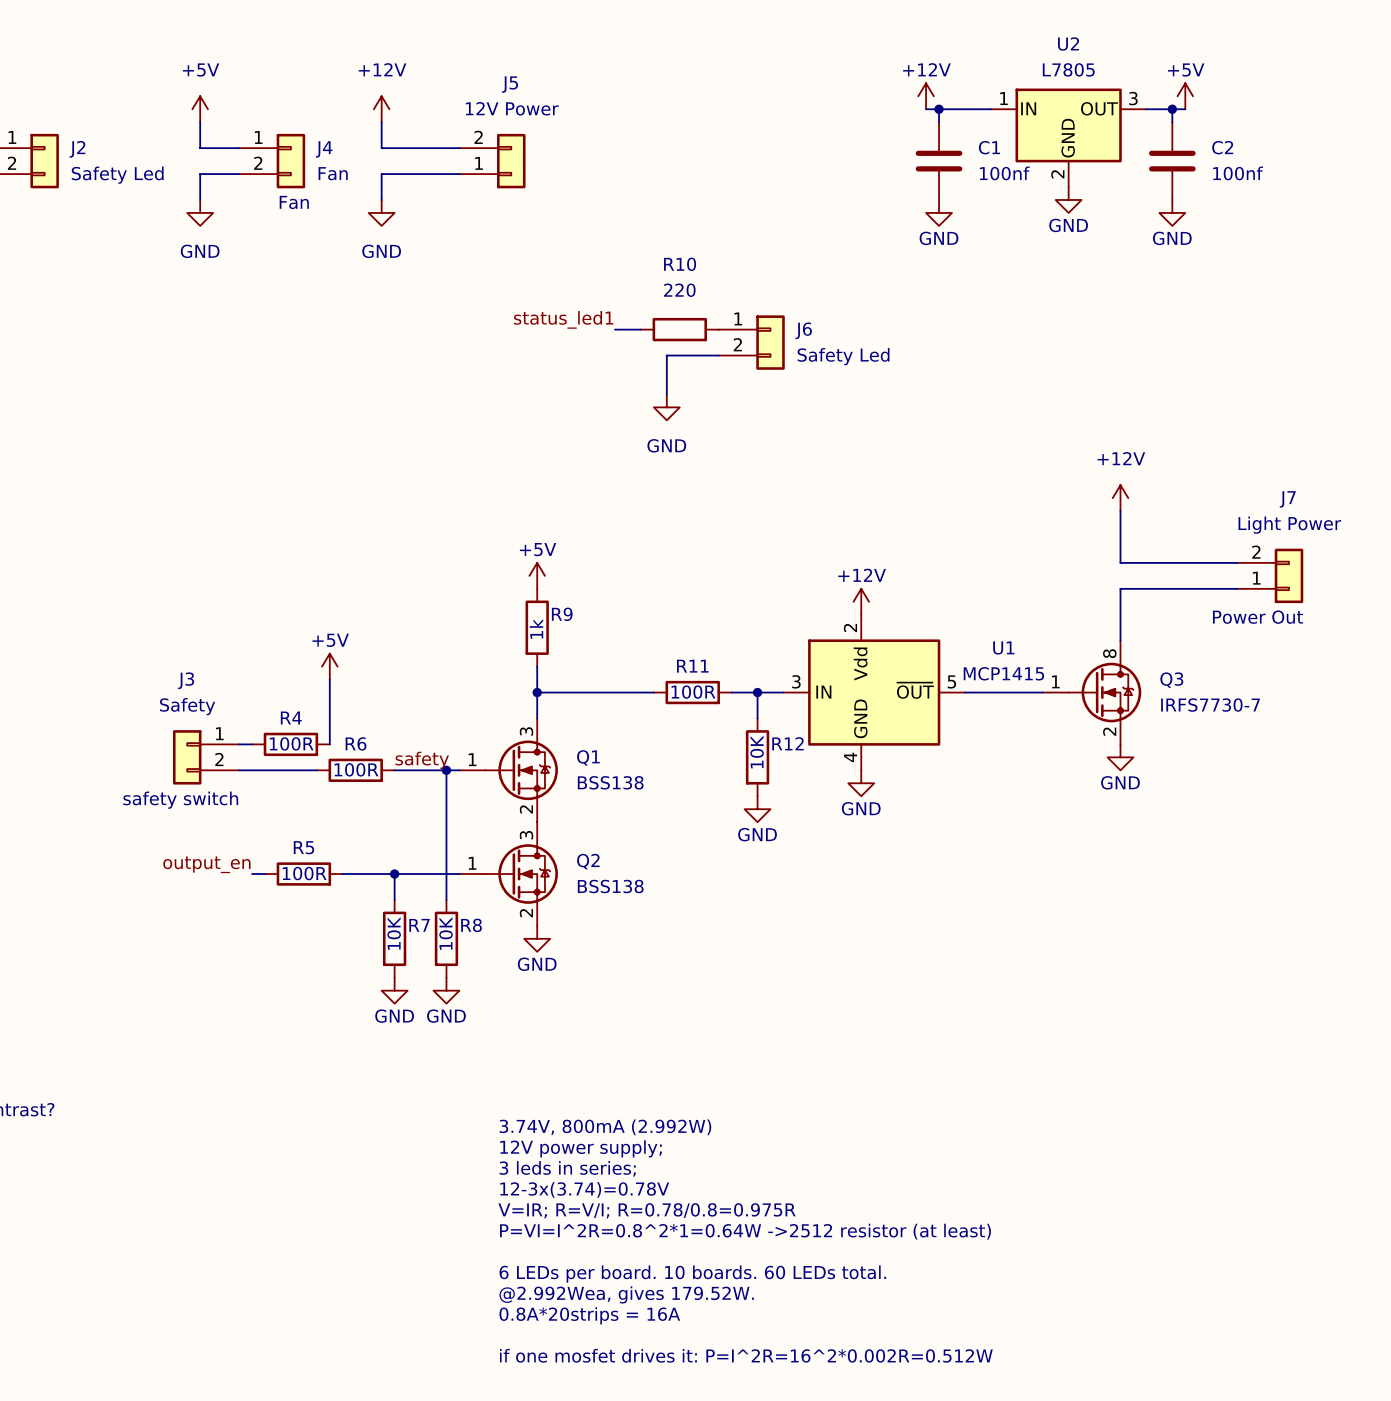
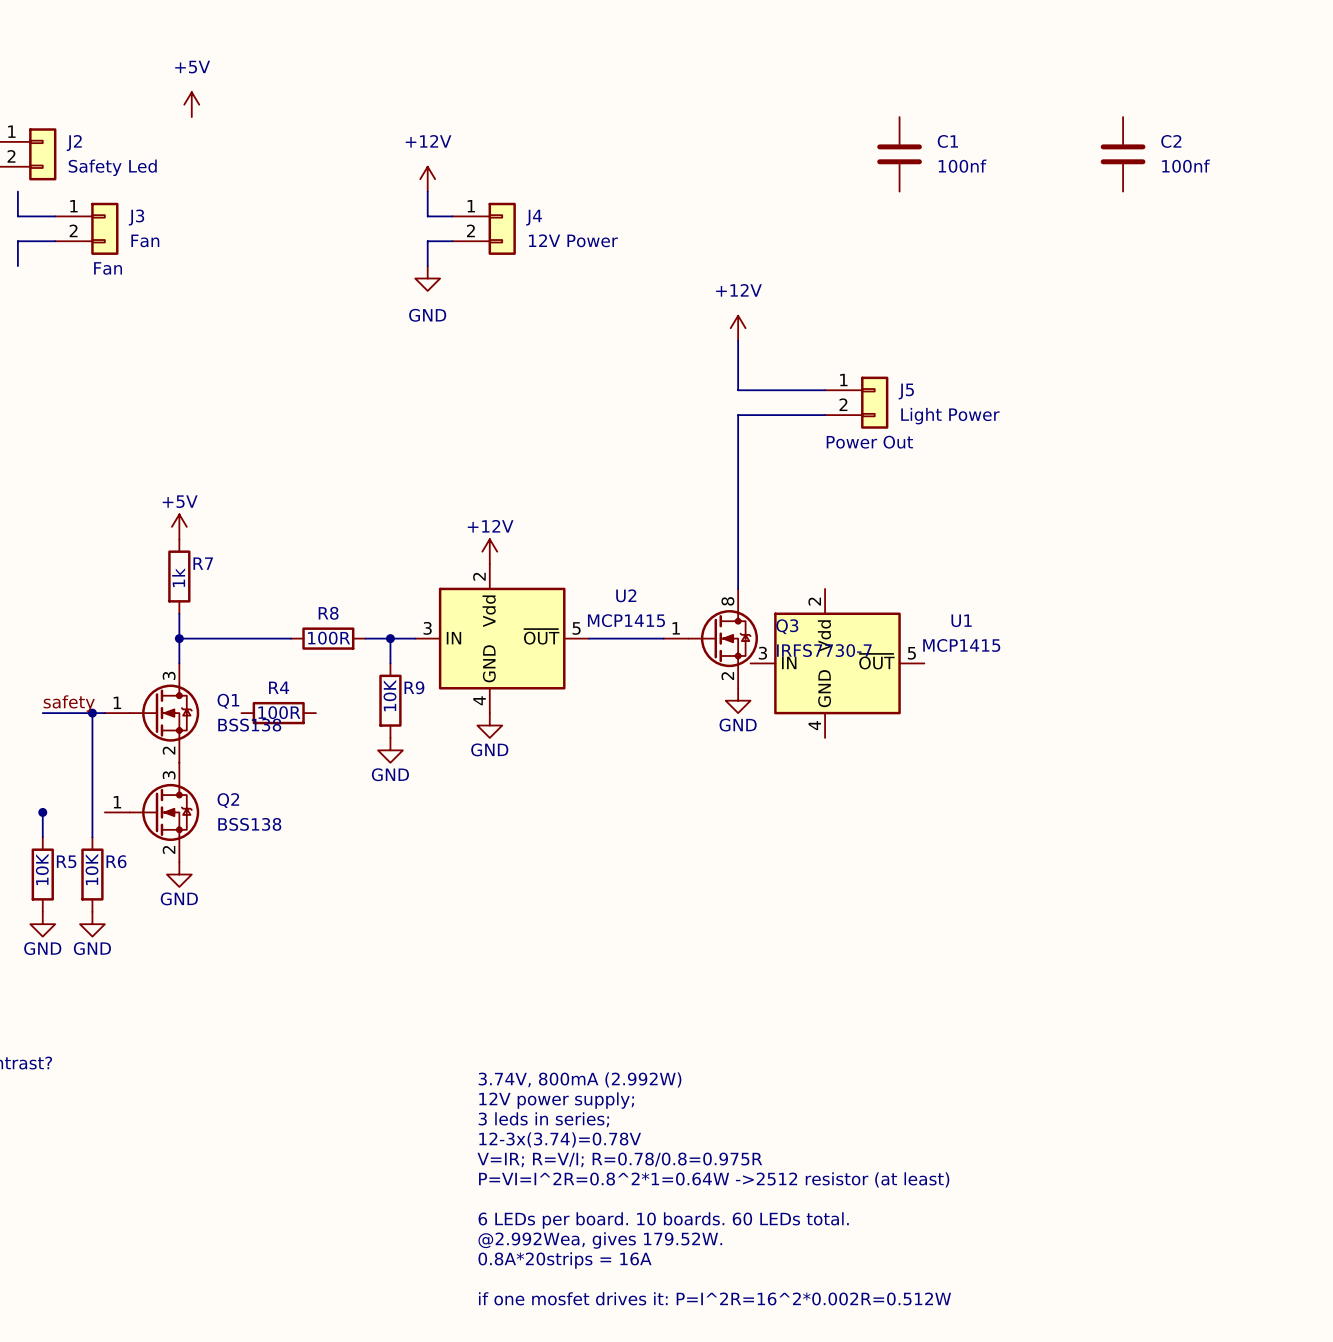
U2 name position: U2 (1068, 43) -> U2 (626, 595)
U2 value: L7805 (1068, 69) -> MCP1415 (626, 620)
J5 name position: J5 (510, 84) -> J5 (906, 391)
U2 symbol: [990, 88, 1147, 188] -> [415, 564, 590, 714]
power symbol: +12V (926, 96) -> none
power symbol: +5V (1185, 96) -> none
J5 value: 12V Power (512, 108) -> Light Power (950, 416)
power symbol position: +12V (381, 109) -> +12V (427, 179)
wire: (926, 109) (990, 109) -> none
wire: (939, 109) (939, 122) -> none
junction: (939, 109) -> none
wire: (1146, 109) (1185, 109) -> none
wire: (1172, 109) (1172, 122) -> none
junction: (1172, 109) -> none
wire: (200, 122) (200, 148) (239, 148) -> (17, 191) (17, 216) (55, 216)
wire: (381, 122) (381, 148) (459, 148) -> none
J4 position: (272, 161) -> (484, 228)
J5 position: (492, 161) -> (856, 402)
J5 flip: as is (511, 161) -> up-down (874, 402)
J4 value: Fan (333, 173) -> 12V Power (573, 240)
wire: (239, 174) (200, 174) (200, 199) -> (55, 241) (17, 241) (17, 266)
wire: (459, 174) (381, 174) (381, 199) -> none
wire: none -> (427, 191) (427, 216) (452, 216)
power symbol: GND (1068, 199) -> none
text position: Fan (294, 202) -> Fan (108, 268)
power symbol: GND (200, 212) -> none
power symbol position: GND (381, 212) -> GND (427, 278)
power symbol: GND (939, 212) -> none
power symbol: GND (1172, 212) -> none
wire: none -> (452, 241) (427, 241) (427, 266)
label: status_led1 (563, 319) -> none
wire: (614, 329) (640, 329) -> none
R10: 220 (679, 329) -> none
J6: Safety Led (751, 342) -> none
power symbol: none -> +12V (738, 328)
wire: (718, 355) (666, 355) (666, 394) -> none
wire: none -> (738, 340) (738, 390) (825, 390)
power symbol: GND (666, 407) -> none
wire: none -> (825, 415) (738, 415) (738, 588)
text: none -> Power Out (869, 442)
power symbol: +12V (1120, 498) -> none
wire: (1120, 511) (1120, 562) (1237, 562) -> none
power symbol: none -> +5V (179, 526)
power symbol: none -> +12V (489, 551)
power symbol: +5V (537, 575) -> none
J7: Light Power (1270, 575) -> none
wire: (1237, 588) (1120, 588) (1120, 640) -> none
power symbol: +12V (861, 601) -> none
text: Power Out (1258, 617) -> none
R9 position: (537, 627) -> (390, 700)
R9 value: 1k (536, 628) -> 10K (389, 695)
wire: none -> (179, 613) (179, 663)
wire: none -> (179, 638) (291, 638)
junction: none -> (179, 638)
power symbol: +5V (329, 666) -> none
wire: none -> (365, 638) (415, 638)
junction: none -> (390, 638)
wire: none -> (589, 638) (663, 638)
wire: (329, 679) (329, 744) -> none
J3 name position: J3 (186, 680) -> J3 (136, 217)
wire: (537, 692) (653, 692) -> none
junction: (537, 692) -> none
R11: 100R (692, 692) -> none
wire: (731, 692) (783, 692) -> none
wire: (757, 692) (757, 718) -> none
junction: (757, 692) -> none
wire: (964, 692) (1042, 692) -> none
Q3 position: (1091, 692) -> (710, 638)
J3 value: Safety (187, 706) -> Fan (145, 240)
power symbol: none -> GND (738, 700)
label: none -> safety (69, 703)
wire: none -> (42, 713) (104, 713)
wire: none -> (92, 713) (92, 837)
junction: none -> (92, 713)
wire: (239, 744) (252, 744) -> none
J3 flip: as is (187, 757) -> left-right (104, 228)
J3 position: (206, 757) -> (86, 228)
power symbol: none -> GND (489, 725)
R12: 10K (757, 757) -> none
power symbol: GND (1120, 757) -> none
label: safety (422, 760) -> none
R6 value: 100R (356, 769) -> 10K (91, 869)
wire: (239, 770) (316, 770) -> none
R6 rotation: 0° (355, 770) -> 90° clockwise (92, 874)
R6 position: (355, 770) -> (92, 874)
wire: (394, 770) (459, 770) -> none
wire: (446, 770) (446, 899) -> none
junction: (446, 770) -> none
Q1 position: (508, 770) -> (152, 713)
power symbol: none -> GND (390, 750)
power symbol: GND (861, 783) -> none
text: safety switch (180, 800) -> none
power symbol: GND (757, 809) -> none
wire: none -> (42, 812) (42, 837)
junction: none -> (42, 812)
label: output_en (206, 864) -> none
R5 value: 100R (304, 873) -> 10K (42, 869)
wire: (252, 874) (265, 874) -> none
R5 rotation: 0° (303, 874) -> 90° clockwise (42, 874)
R5 position: (303, 874) -> (42, 874)
wire: (342, 874) (459, 874) -> none
wire: (394, 874) (394, 899) -> (390, 638) (390, 663)
junction: (394, 874) -> none
Q2 position: (508, 874) -> (152, 812)
power symbol: none -> GND (179, 874)
R8 name position: R8 (471, 925) -> R8 (328, 613)
R7 value: 10K (394, 933) -> 1k (178, 577)
R8 value: 10K (445, 933) -> 100R (329, 638)
R7 position: (394, 938) -> (179, 576)
R8 rotation: 0° (446, 938) -> 90° clockwise (328, 638)
R8 position: (446, 938) -> (328, 638)
power symbol: GND (537, 938) -> none
power symbol: none -> GND (42, 924)
power symbol: none -> GND (92, 924)
power symbol: GND (394, 990) -> none
power symbol: GND (446, 990) -> none

